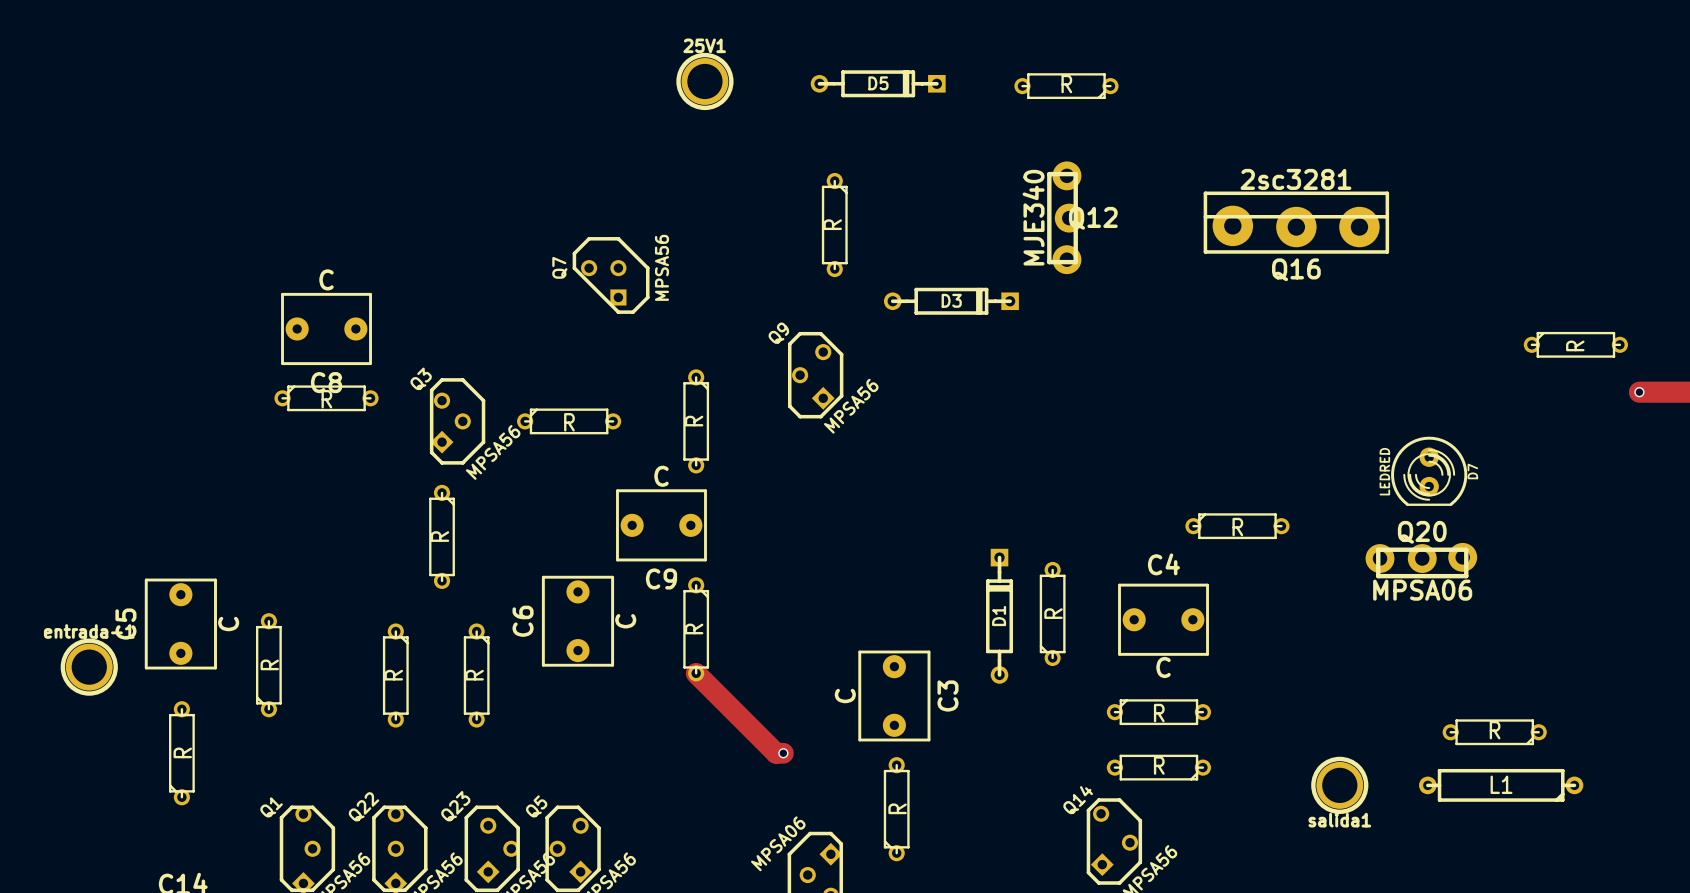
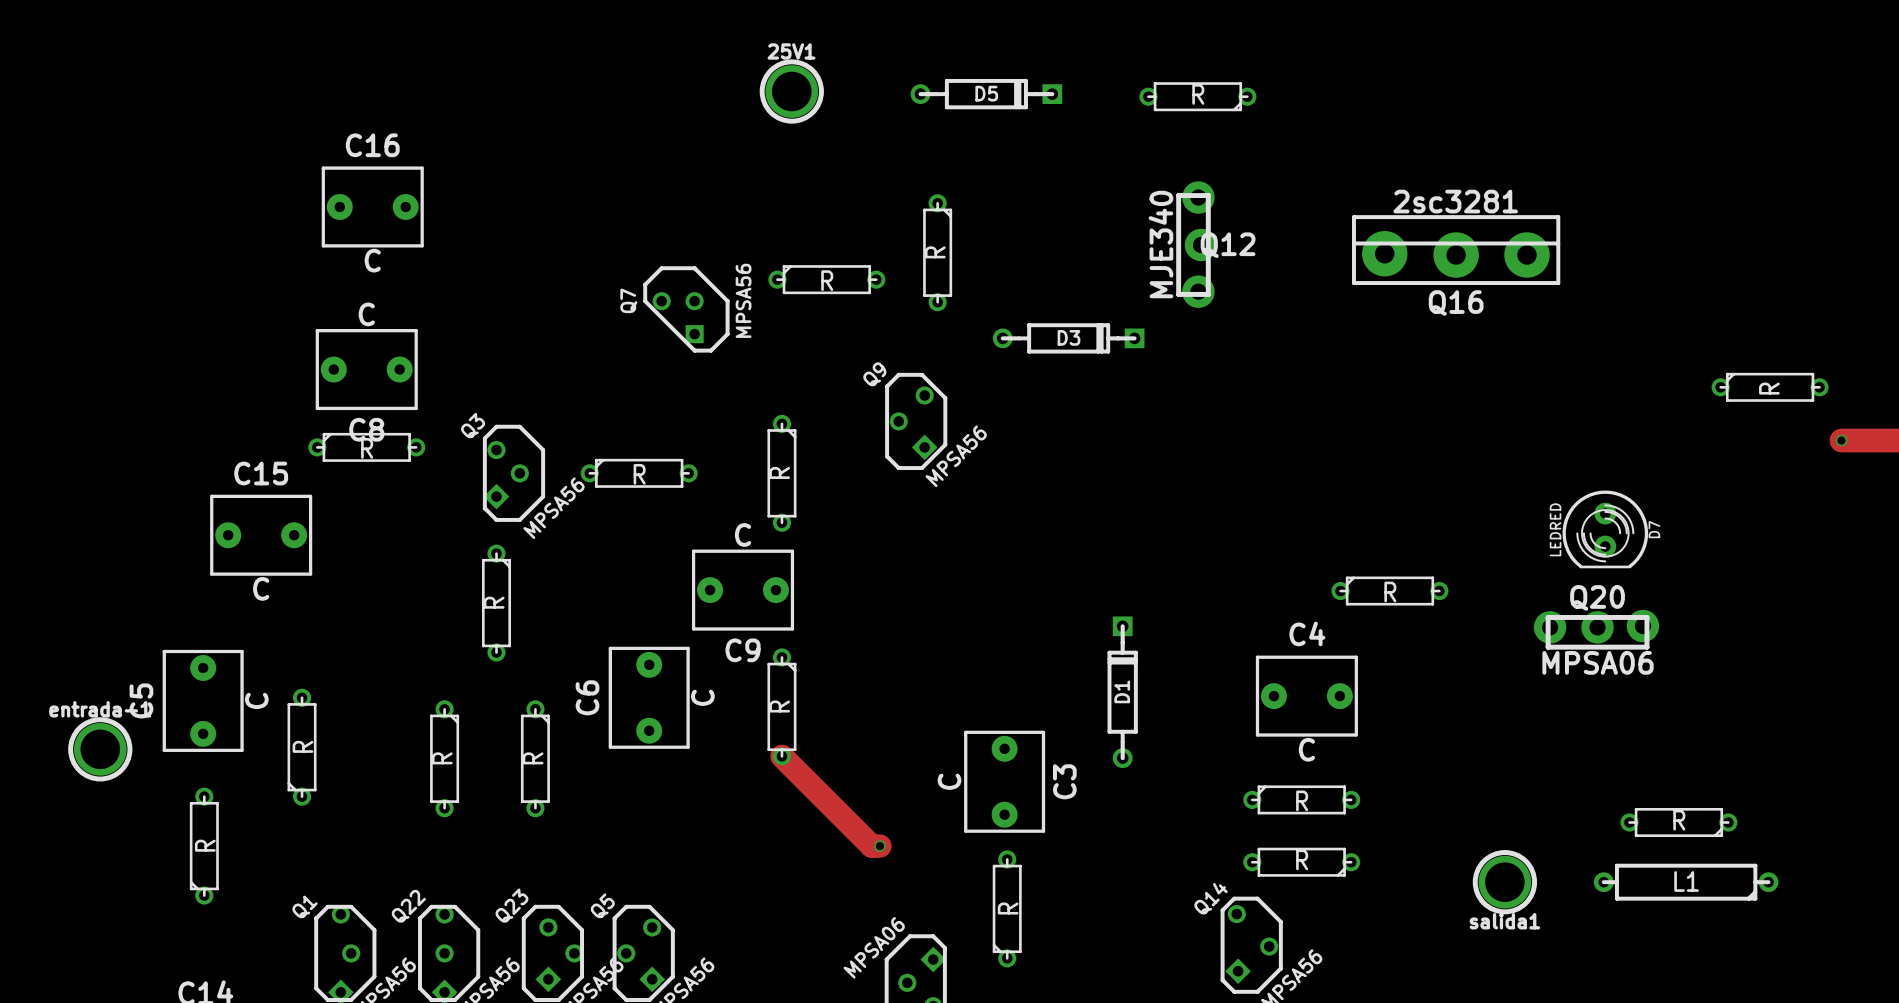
C16: none -> C (372, 206)
part: none -> R (826, 279)
C15: none -> C (261, 535)
part: R (1052, 613) -> none

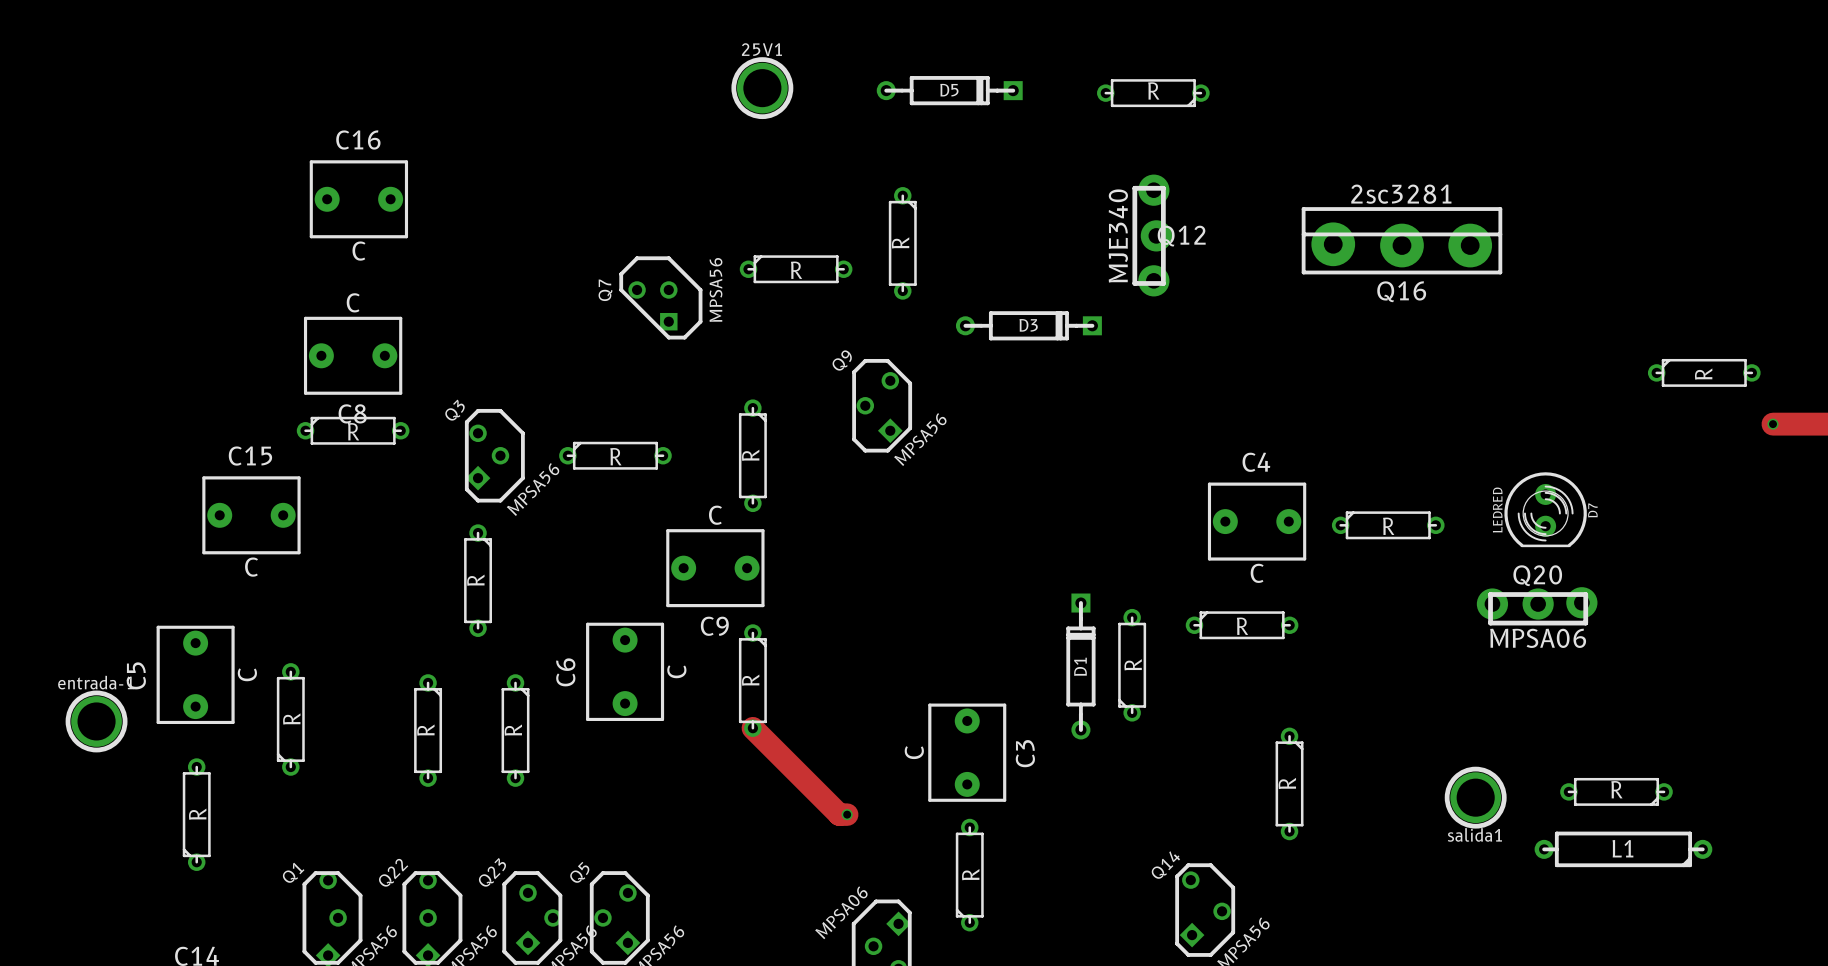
part: none -> R (1388, 525)
part: R (1389, 591) -> none
part: none -> R (1242, 625)
part: none -> R (1132, 665)
C4 position: (1306, 696) -> (1257, 521)
part: R (1301, 799) -> none
part: none -> R (1289, 783)
part: R (1301, 862) -> none
salida1 position: (1504, 882) -> (1475, 797)

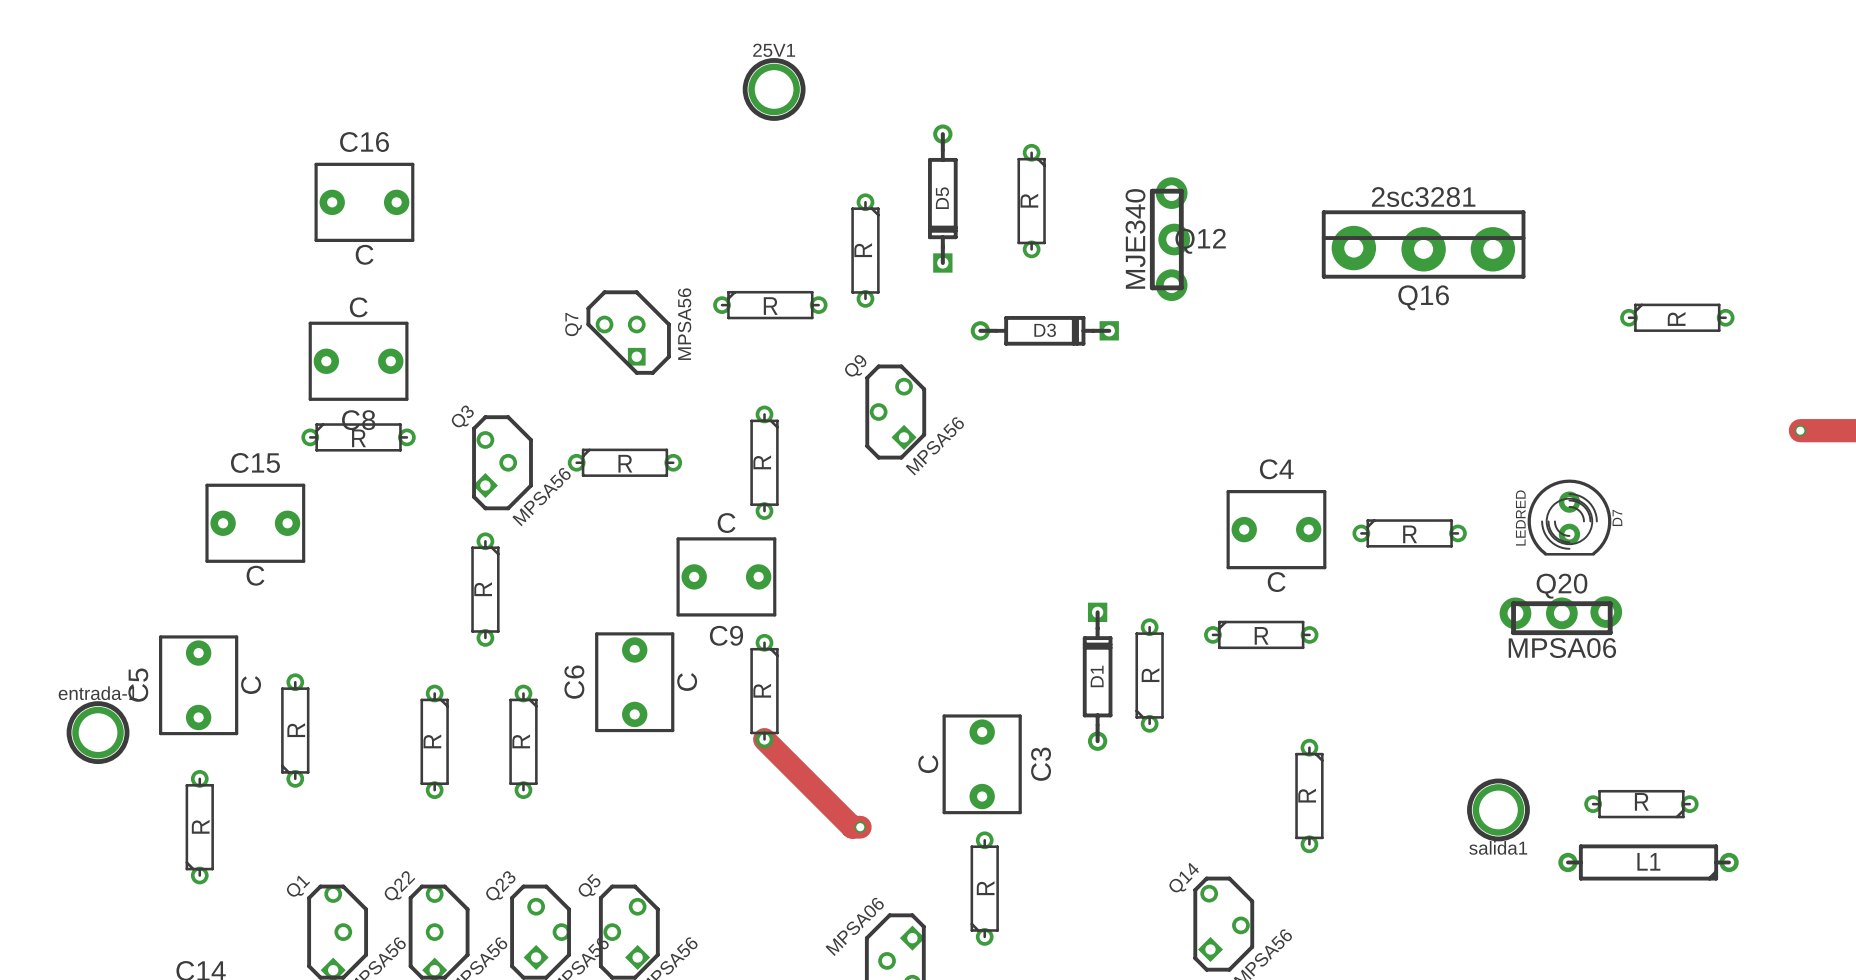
D5 rotation: 0° (949, 90) -> 90° clockwise (942, 198)
D5 position: (949, 90) -> (942, 198)
part: R (1153, 93) -> none
part: none -> R (1031, 201)
part: R (902, 243) -> none
part: none -> R (865, 250)
part: R (796, 269) -> none
Q7 position: (660, 297) -> (628, 332)
part: none -> R (770, 305)
part position: (1704, 372) -> (1677, 317)

